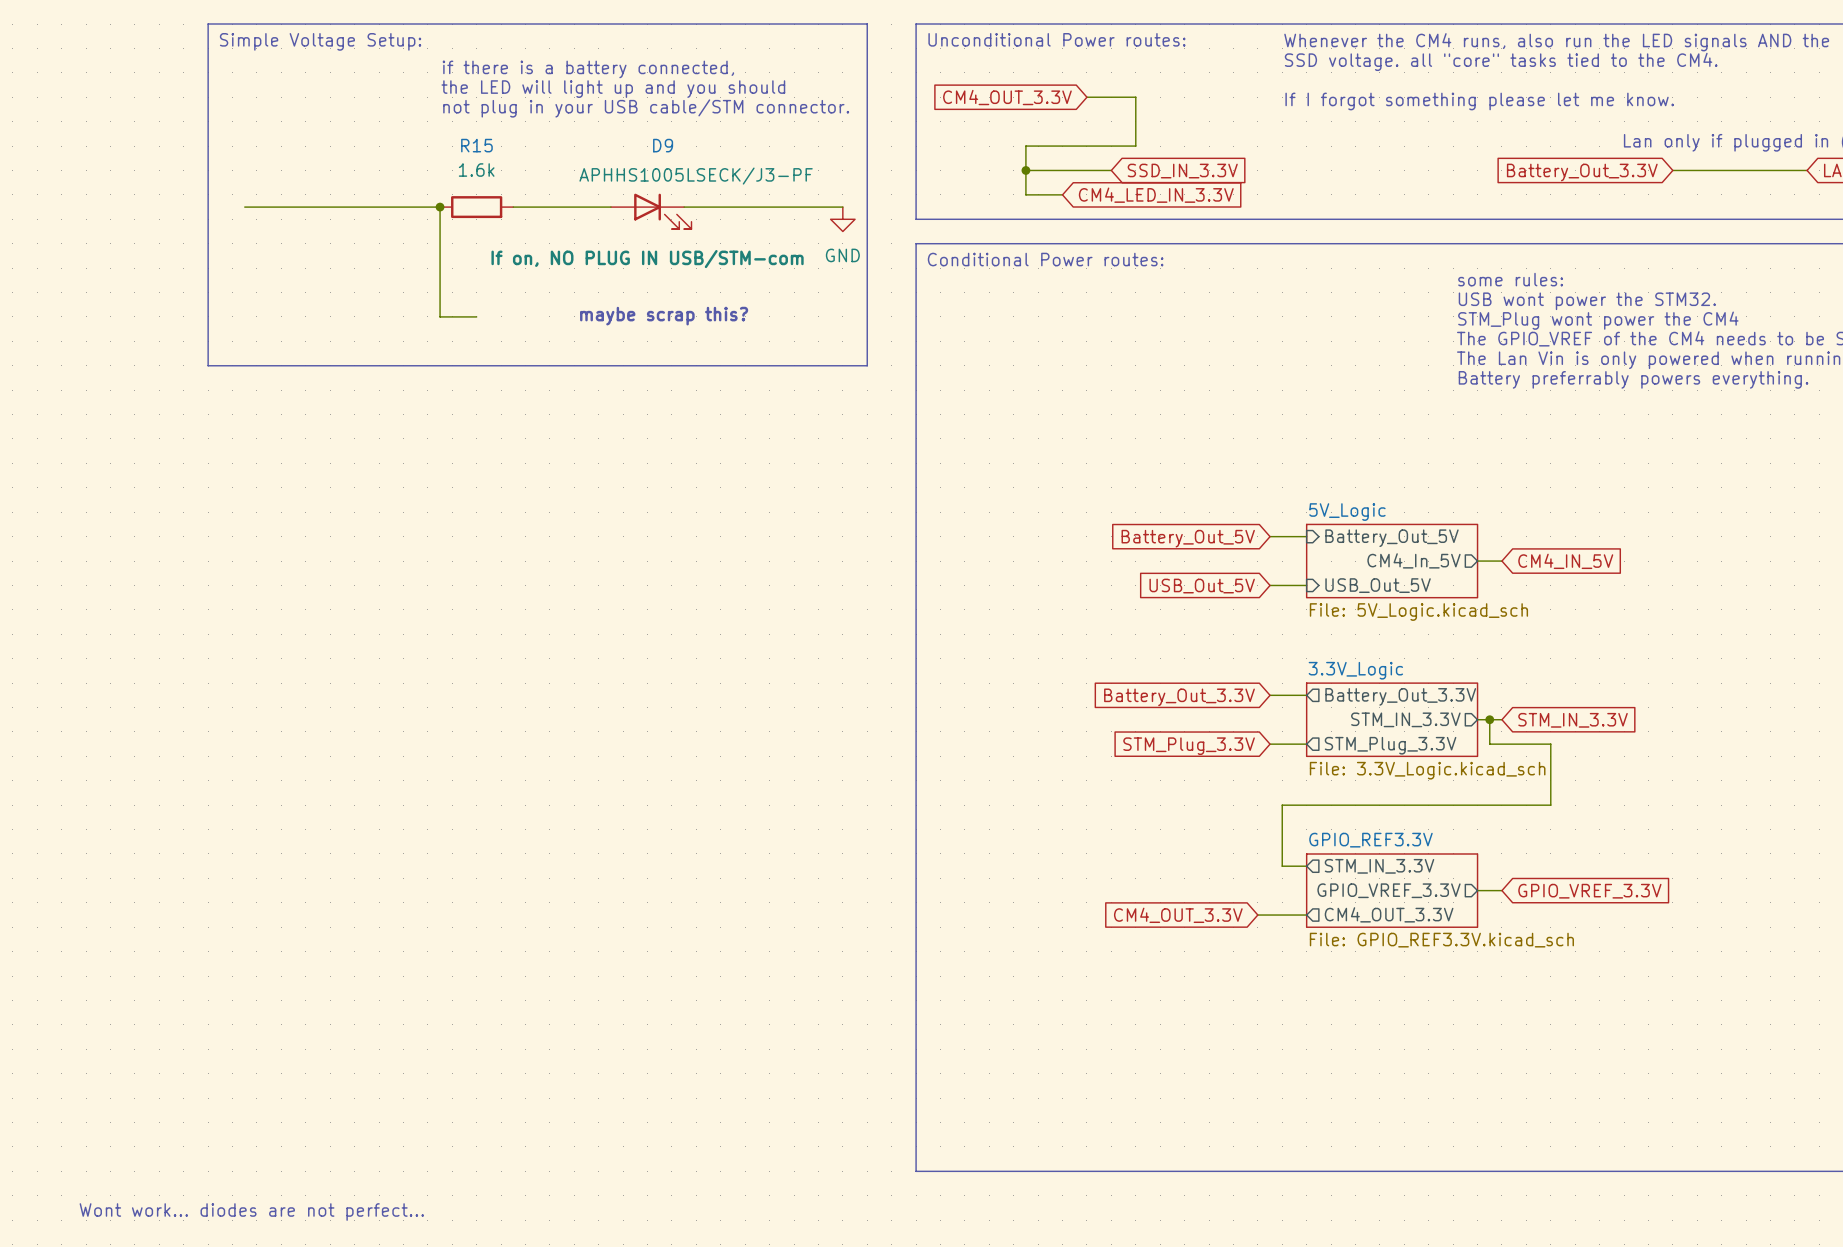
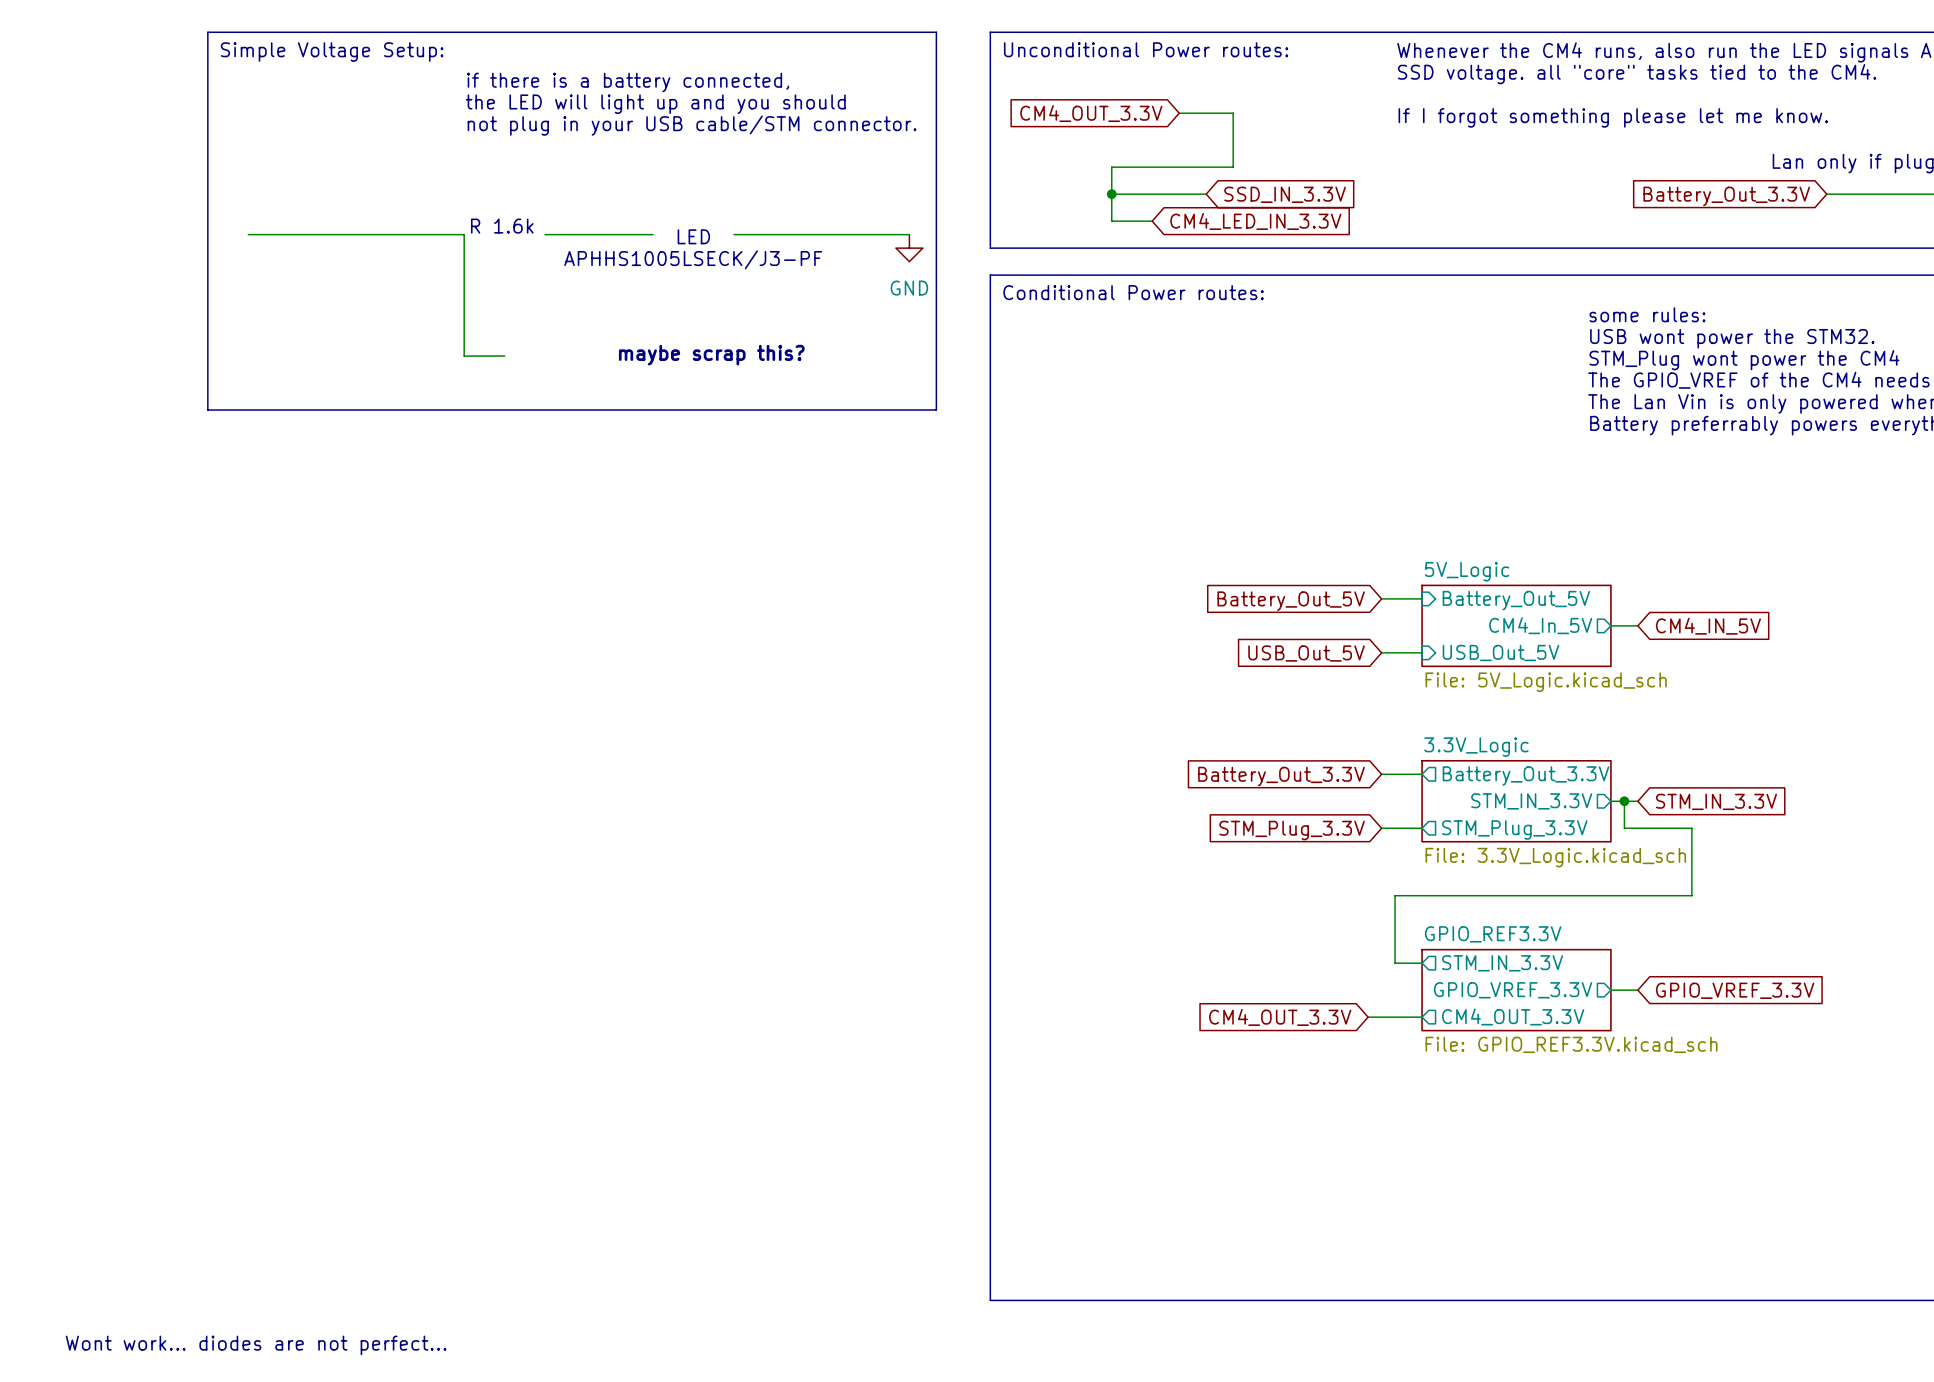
text: none -> R 1.6k (502, 226)
junction: (440, 207) -> none
R15: 1.6k (476, 207) -> none
text: none -> LED (693, 236)
D9: APHHS1005LSECK/J3-PF (651, 211) -> none
text: none -> APHHS1005LSECK/J3-PF (693, 259)

